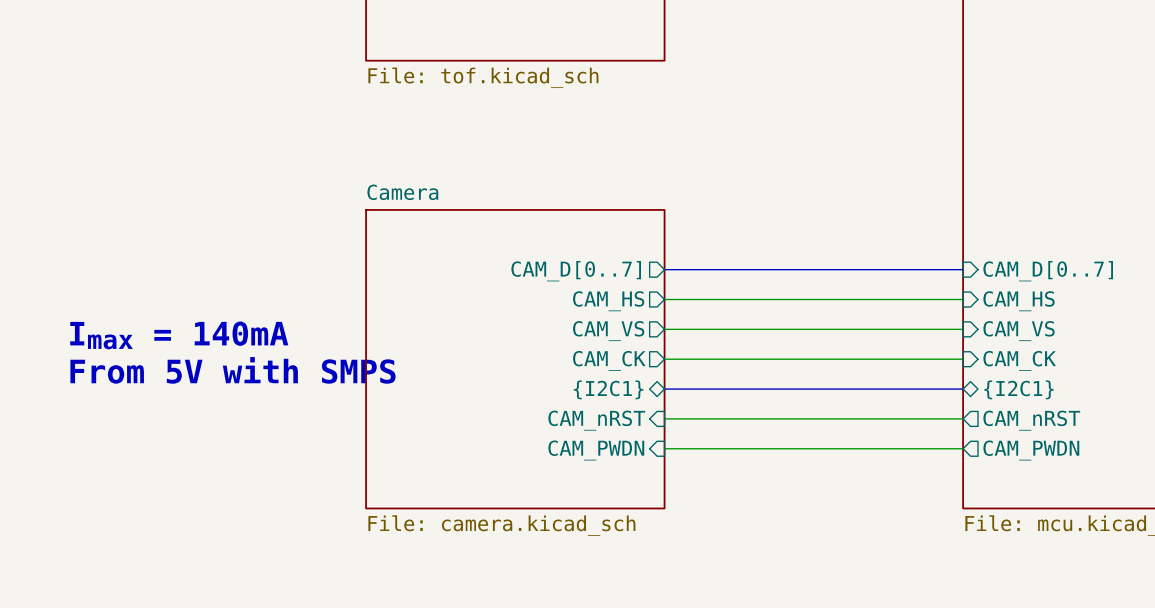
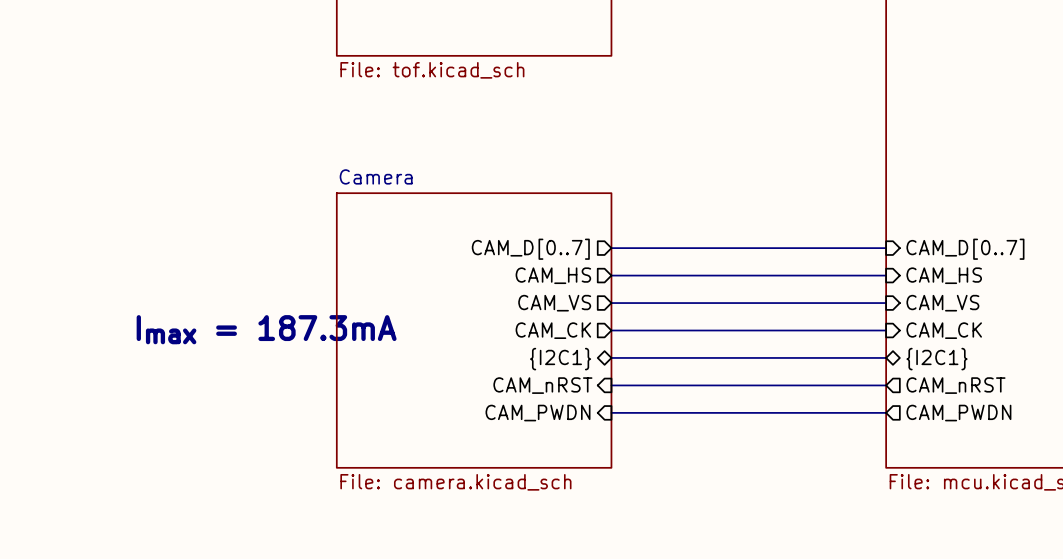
text: Imax = 140mA (179, 335) -> Imax = 187.3mA (266, 329)
text: From 5V with SMPS (232, 370) -> none

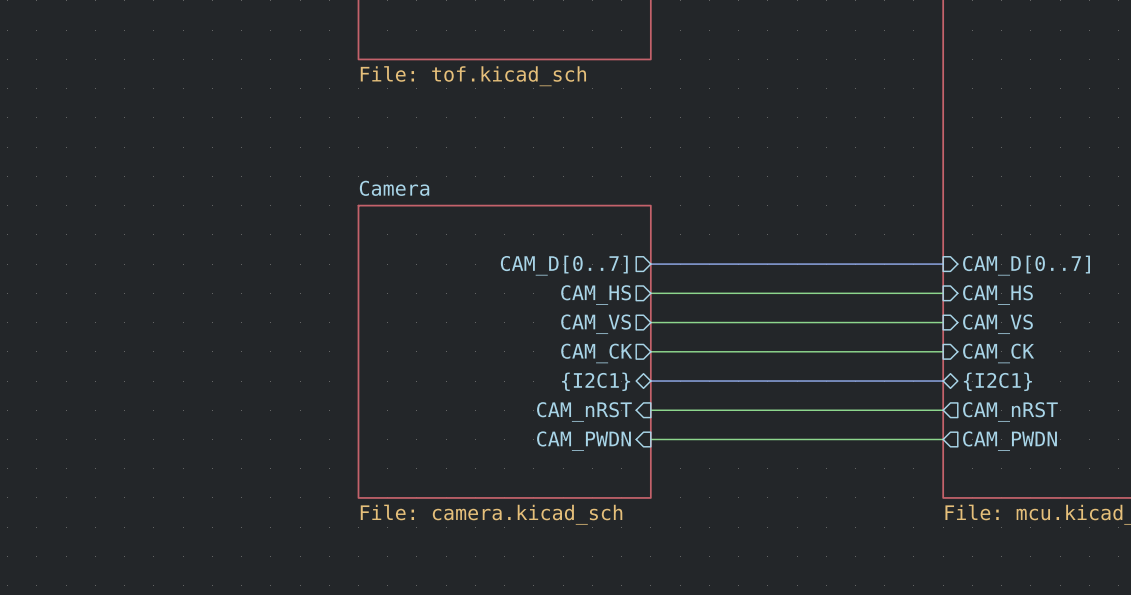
text: Imax = 187.3mA (266, 329) -> none

